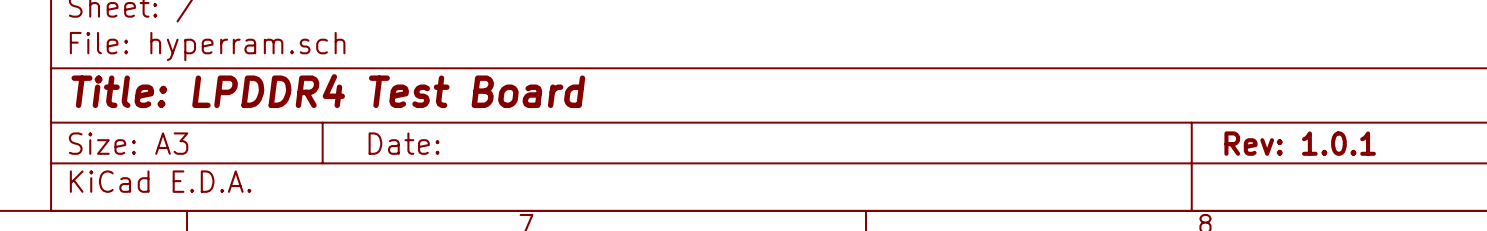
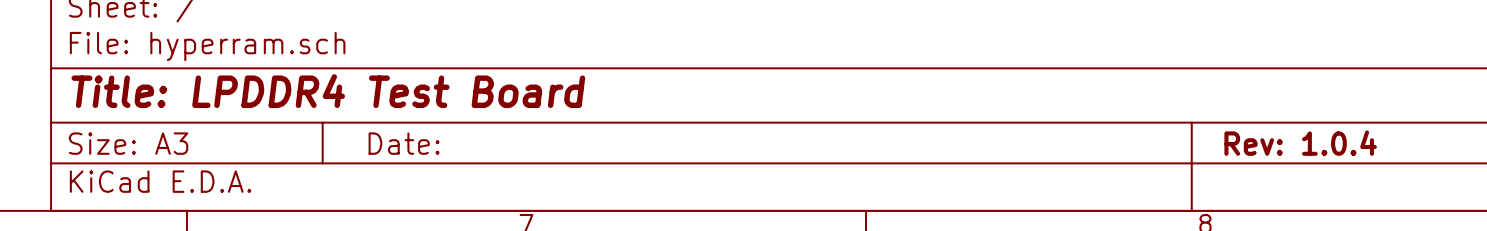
title block: Rev: 1.0.1 (1300, 143) -> Rev: 1.0.4 (1300, 143)

